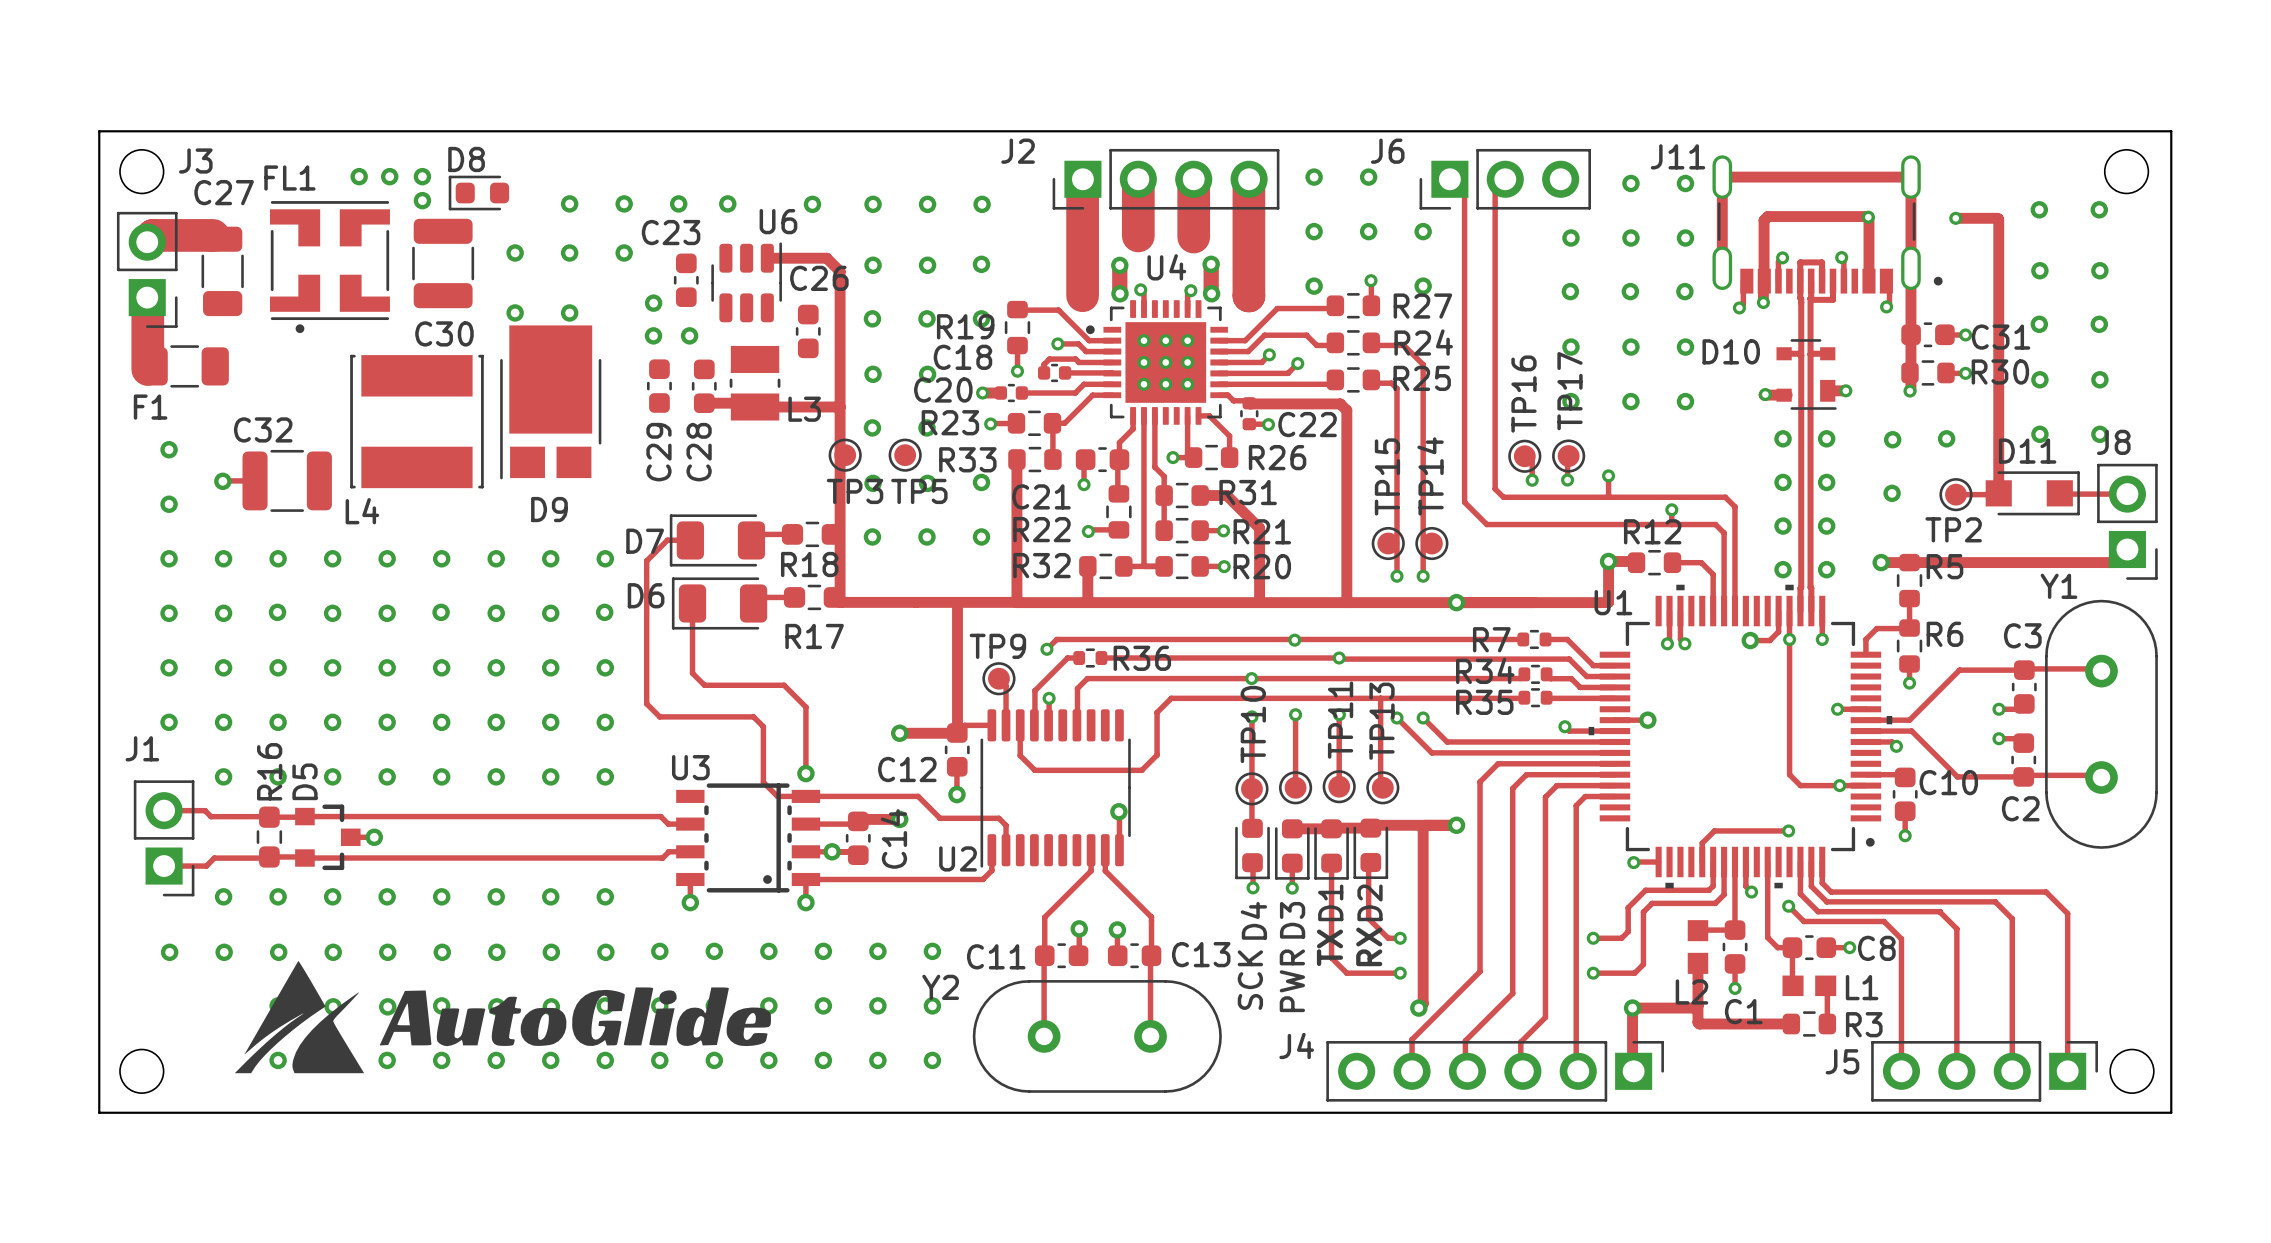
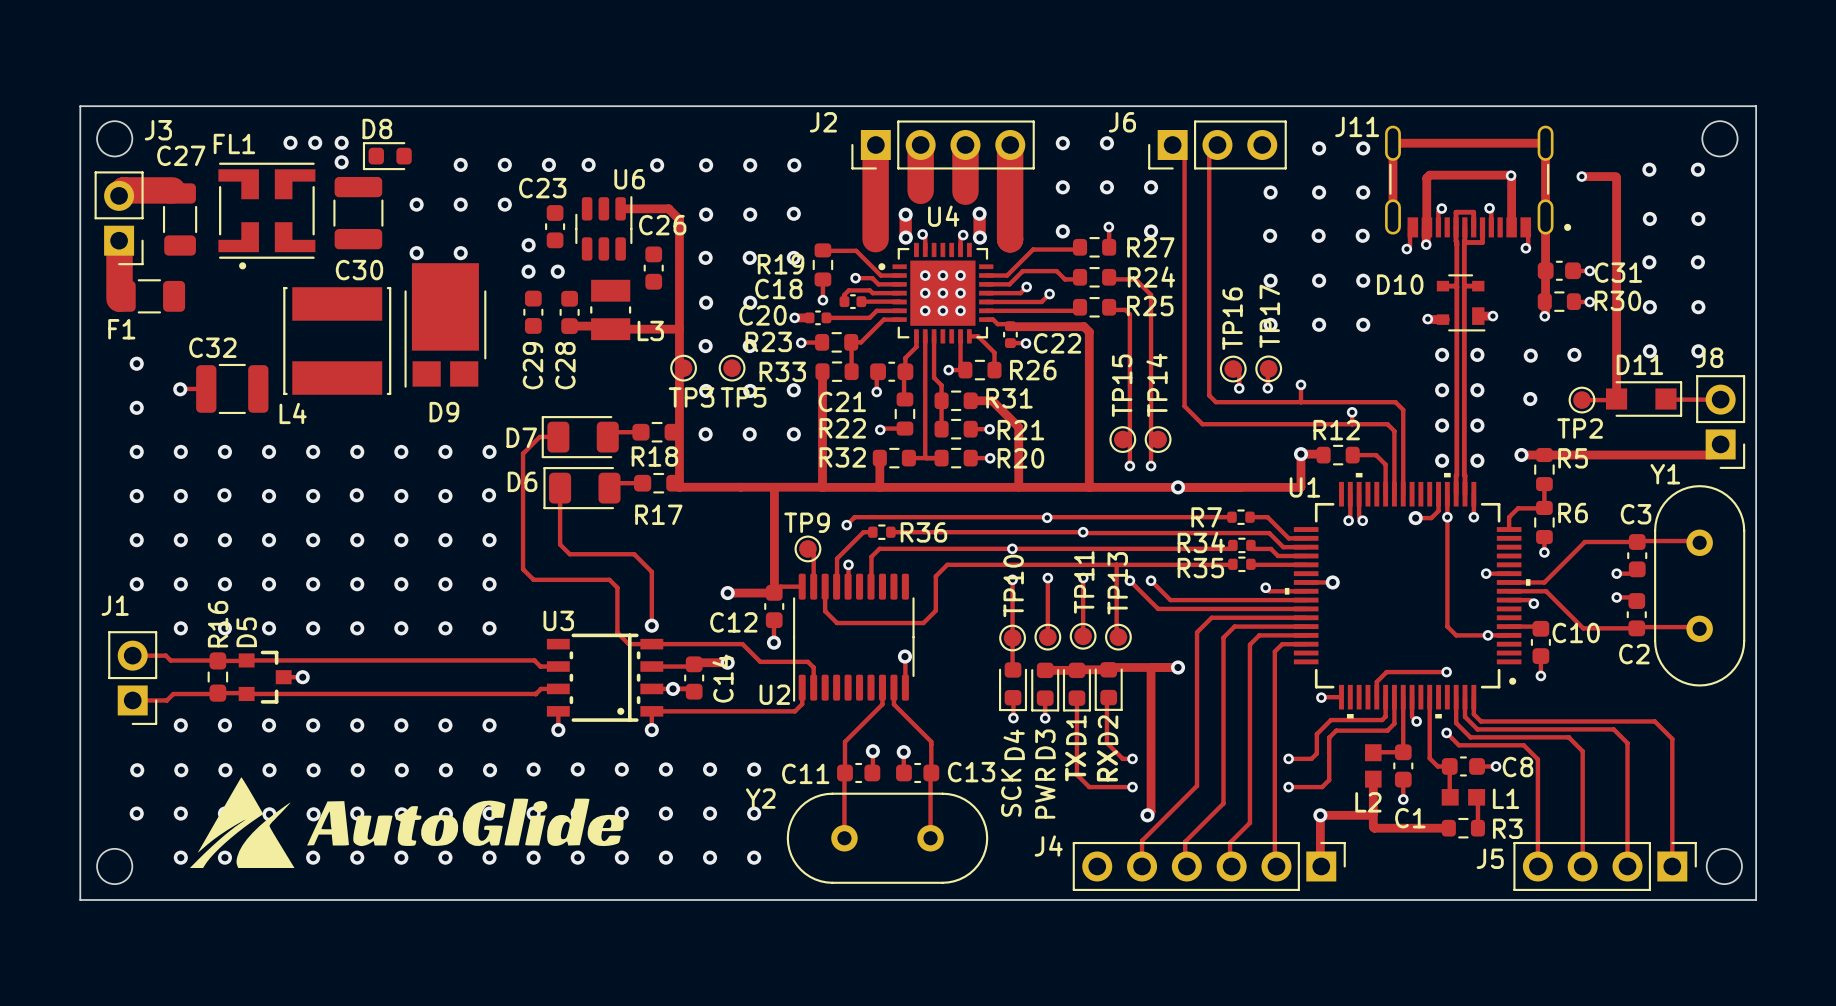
via: none -> (136, 813)
via: none -> (180, 813)
via: none -> (180, 857)

